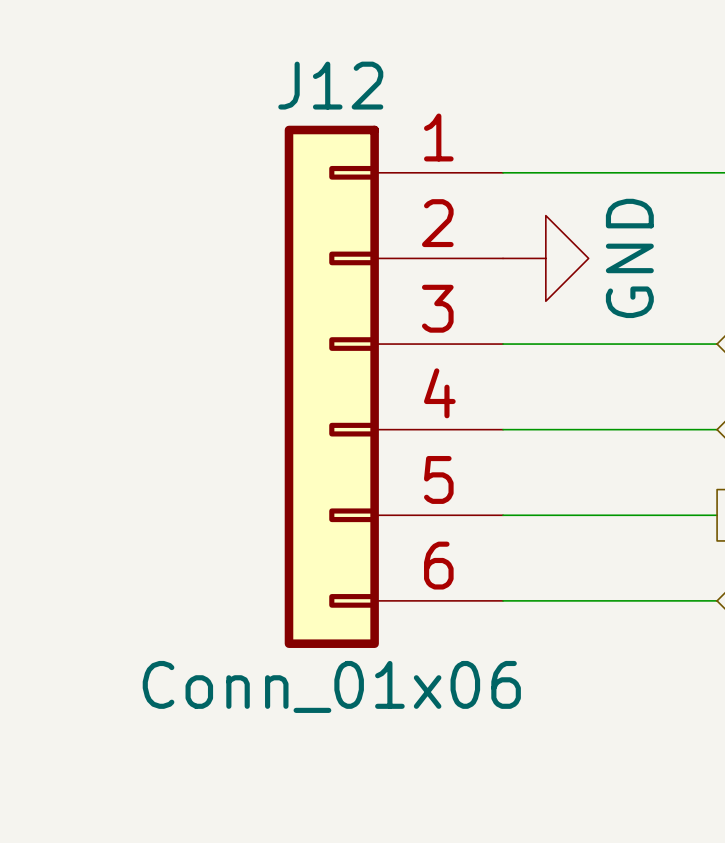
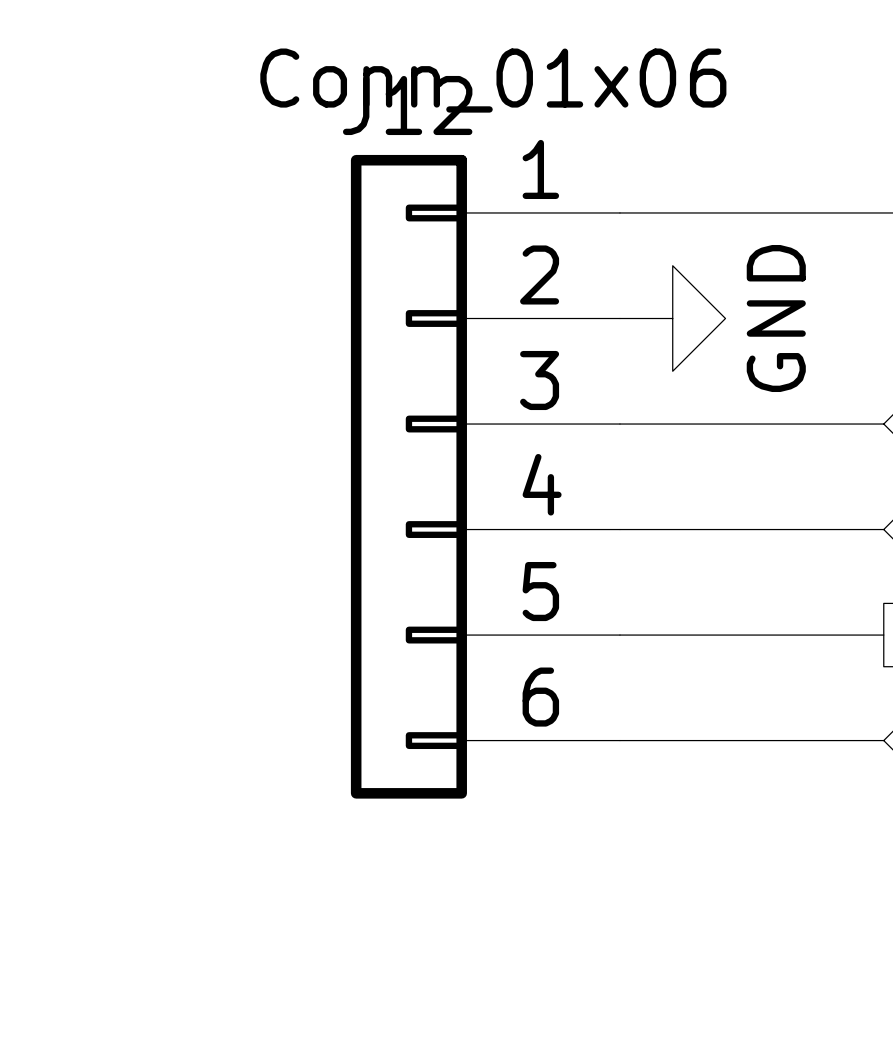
J12 value position: Conn_01x06 (331, 686) -> Conn_01x06 (493, 80)

